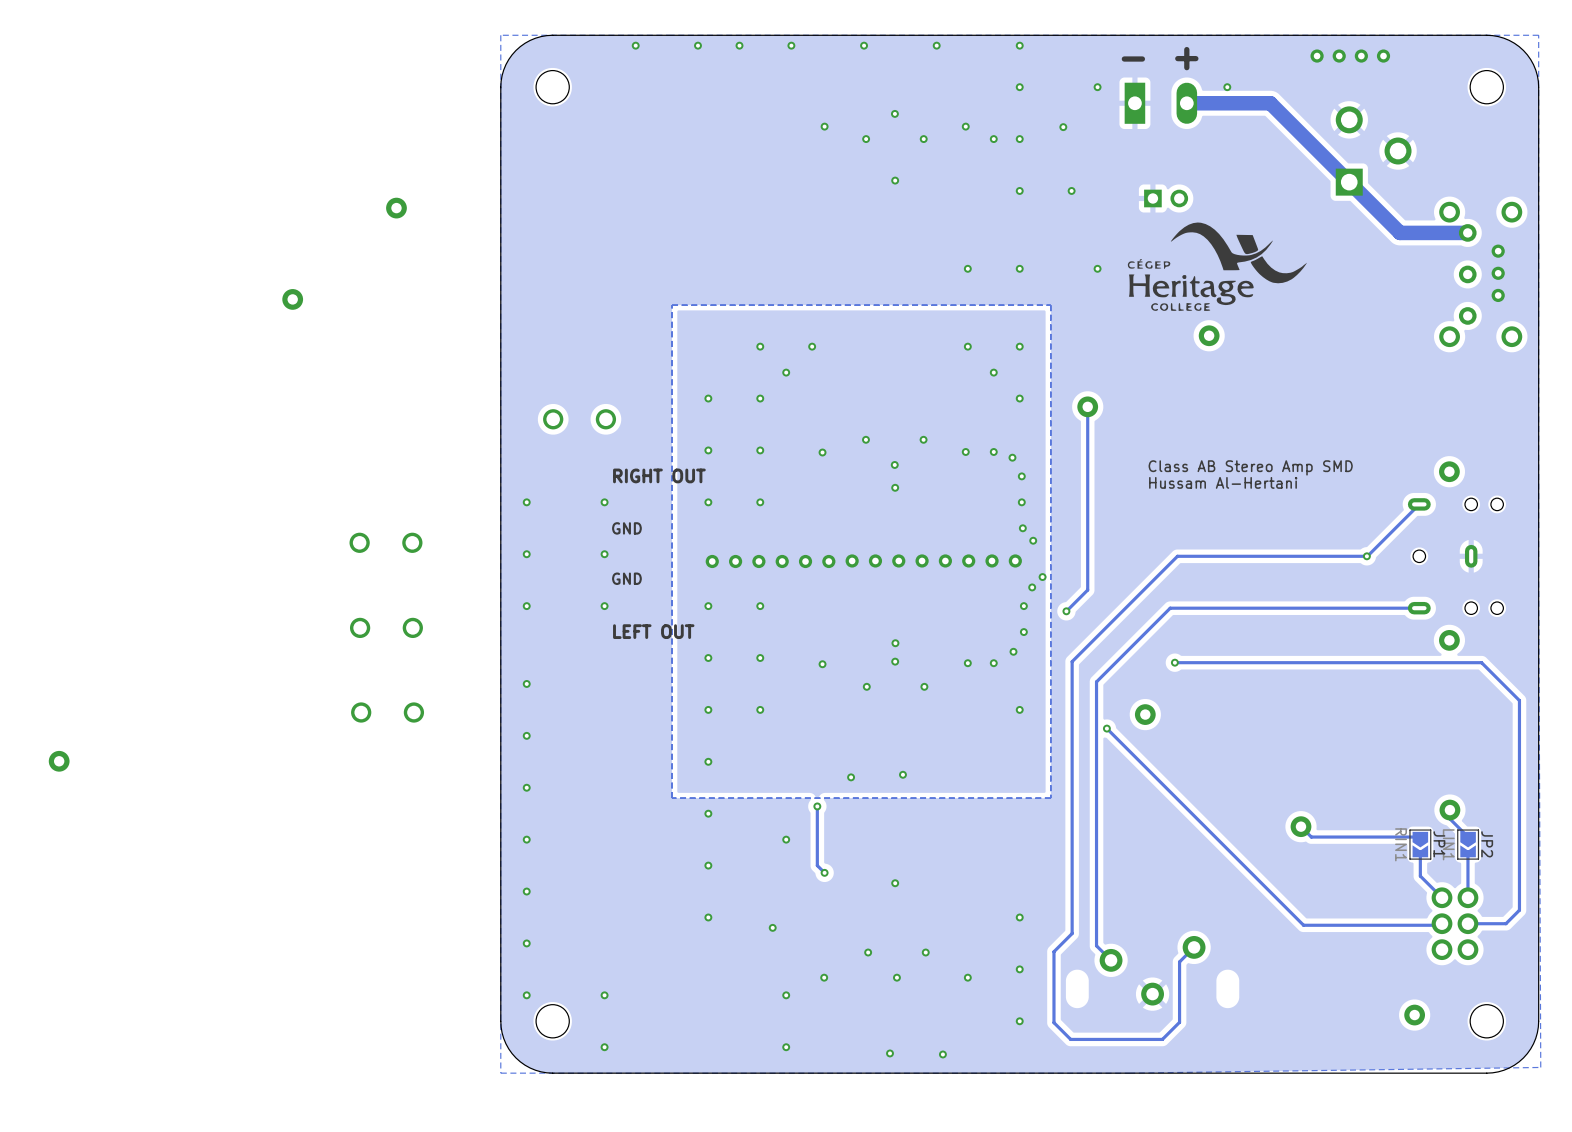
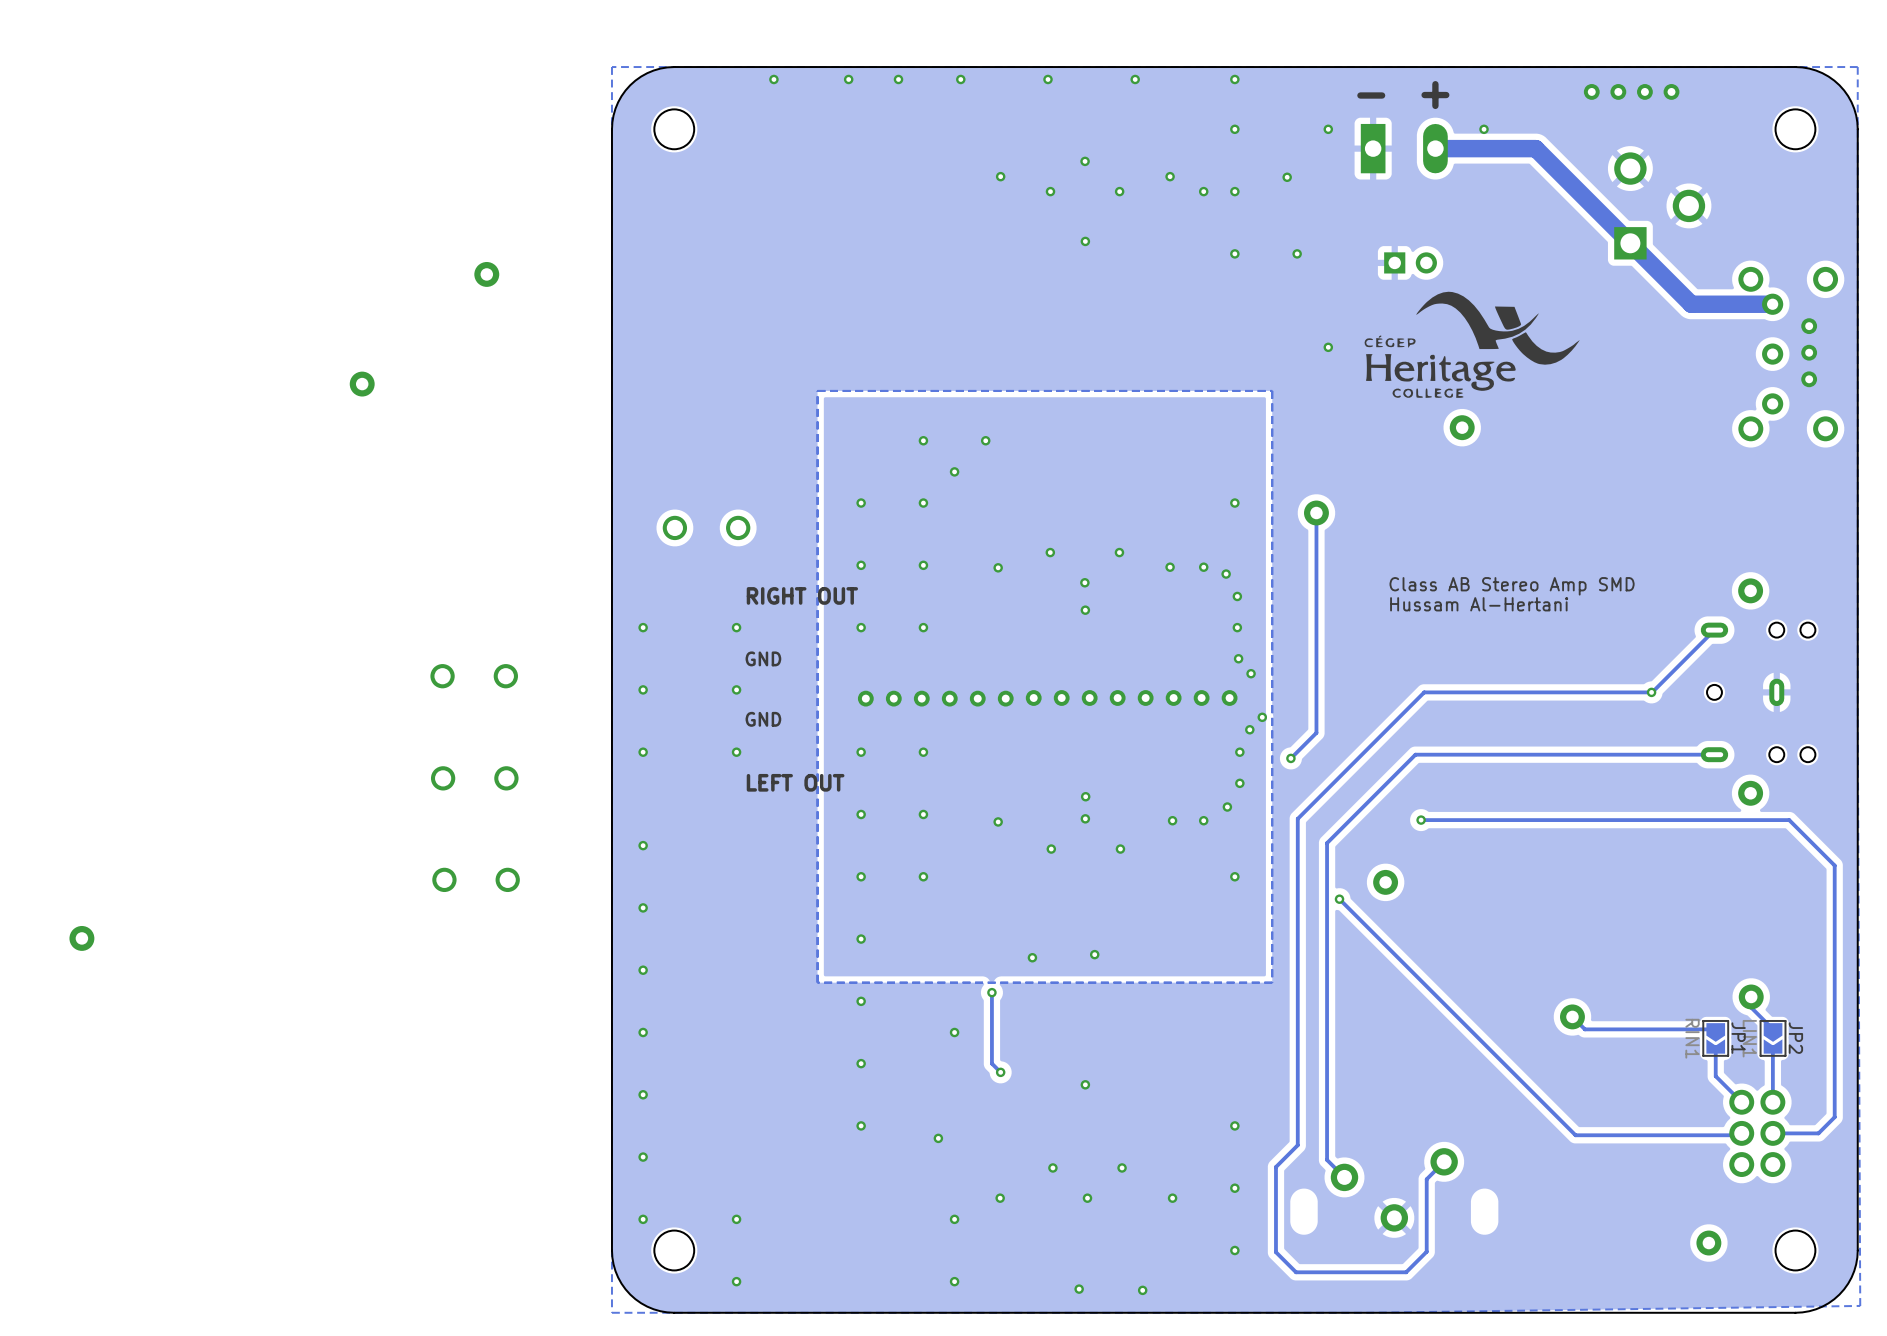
via: (967, 268) -> none
via: (1019, 268) -> none
via: (967, 346) -> none
via: (1019, 346) -> none
via: (993, 372) -> none

